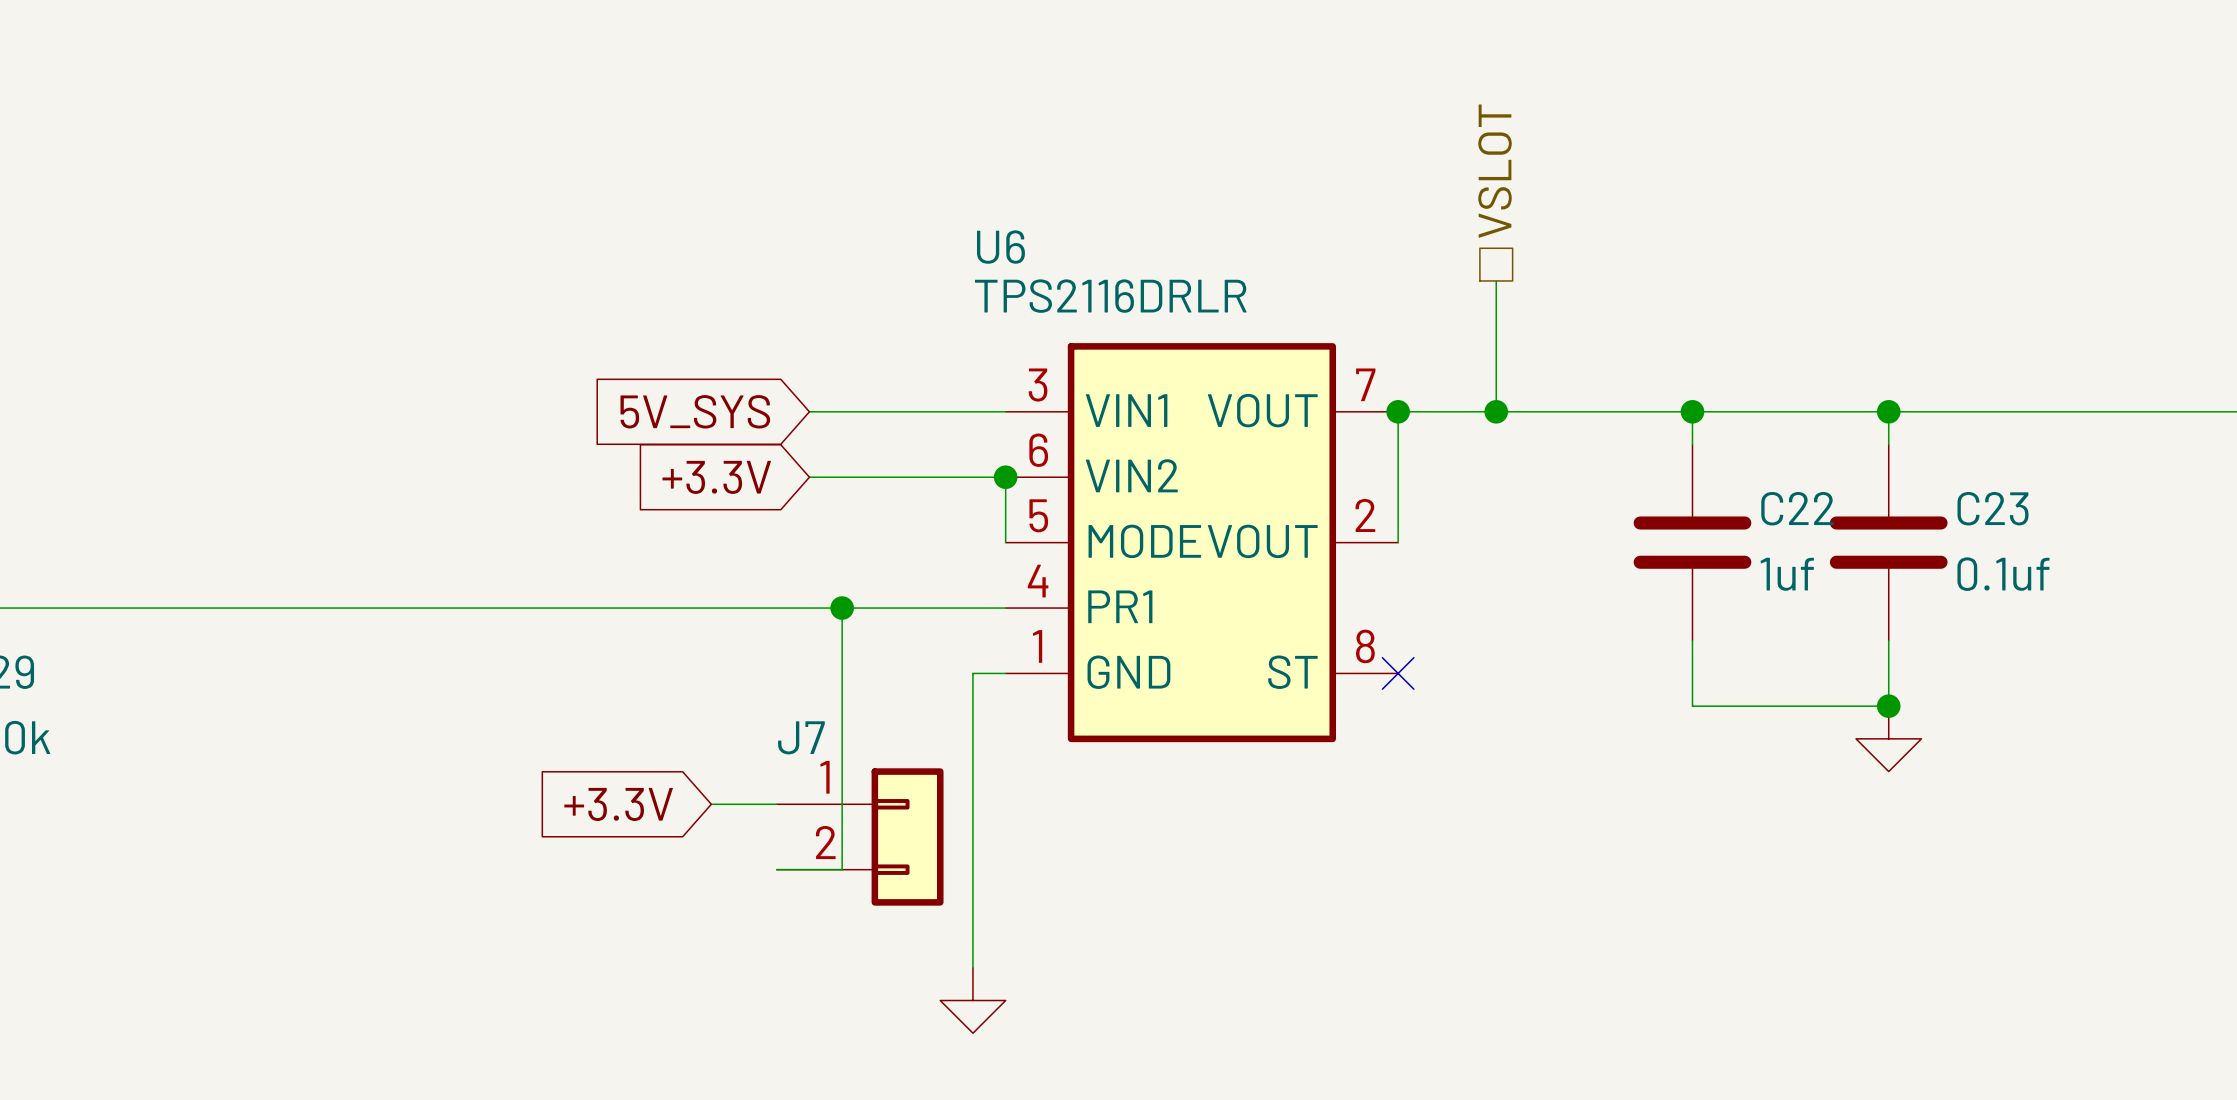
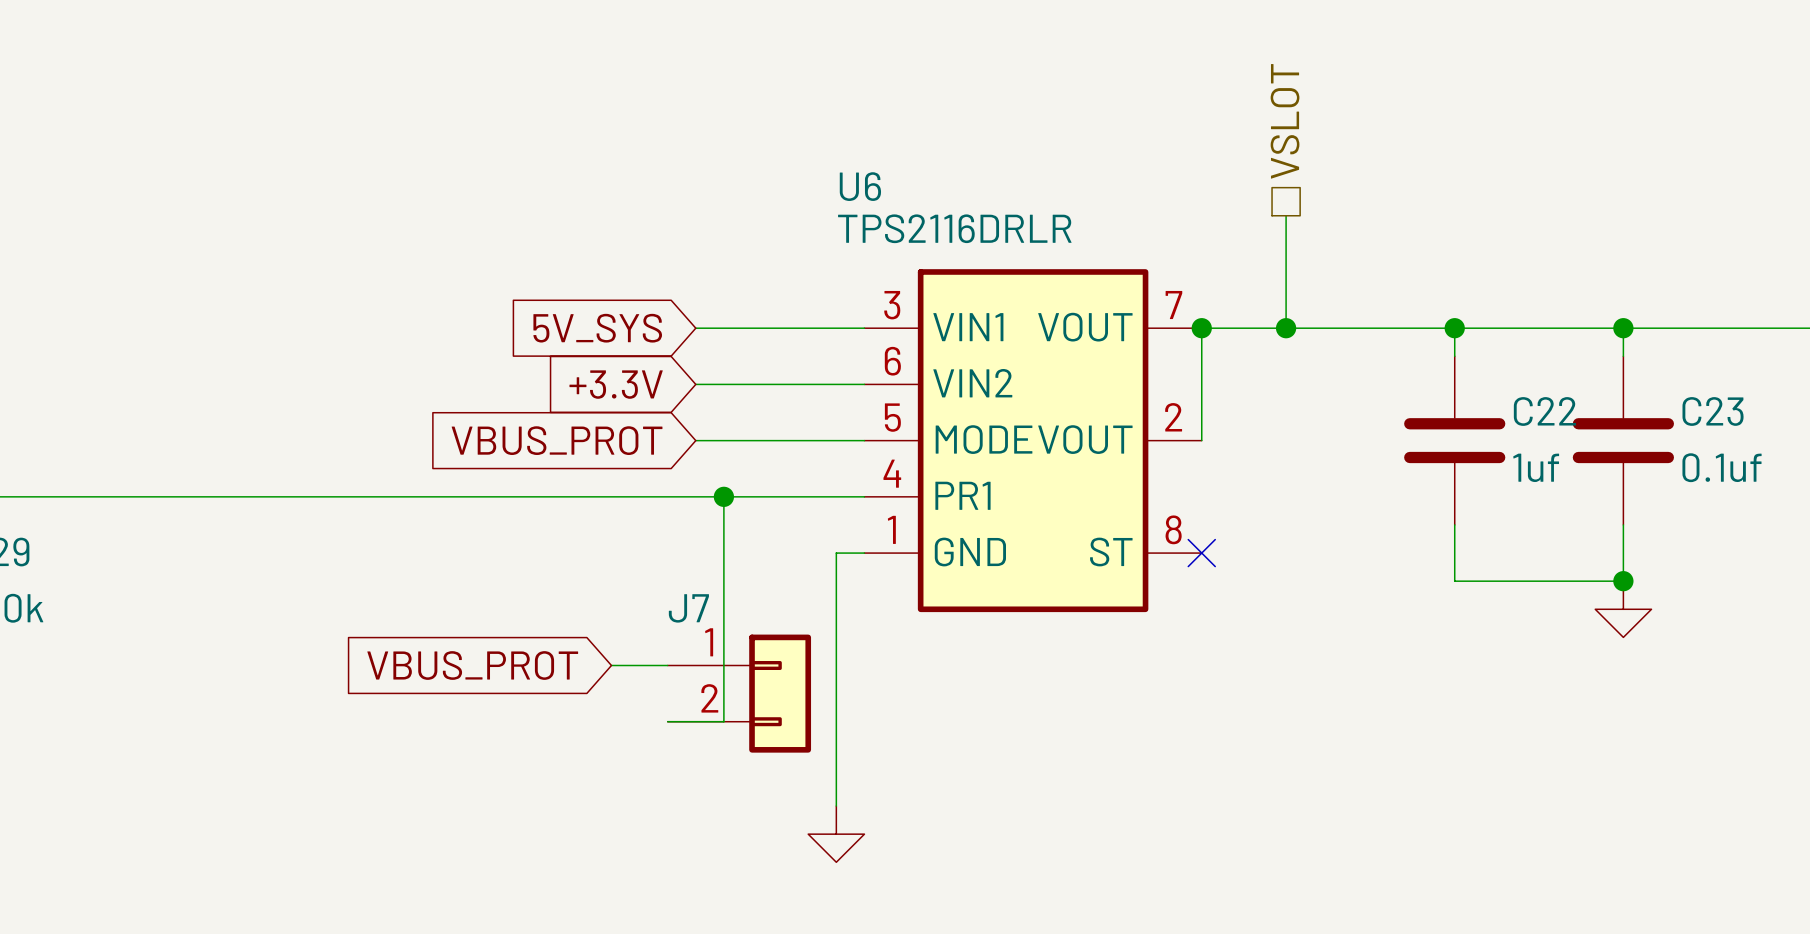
wire: (1005, 477) (1005, 542) -> (695, 440) (864, 440)
junction: (1005, 477) -> none
global label: none -> VBUS_PROT (557, 440)
global label: +3.3V (618, 804) -> VBUS_PROT (472, 665)

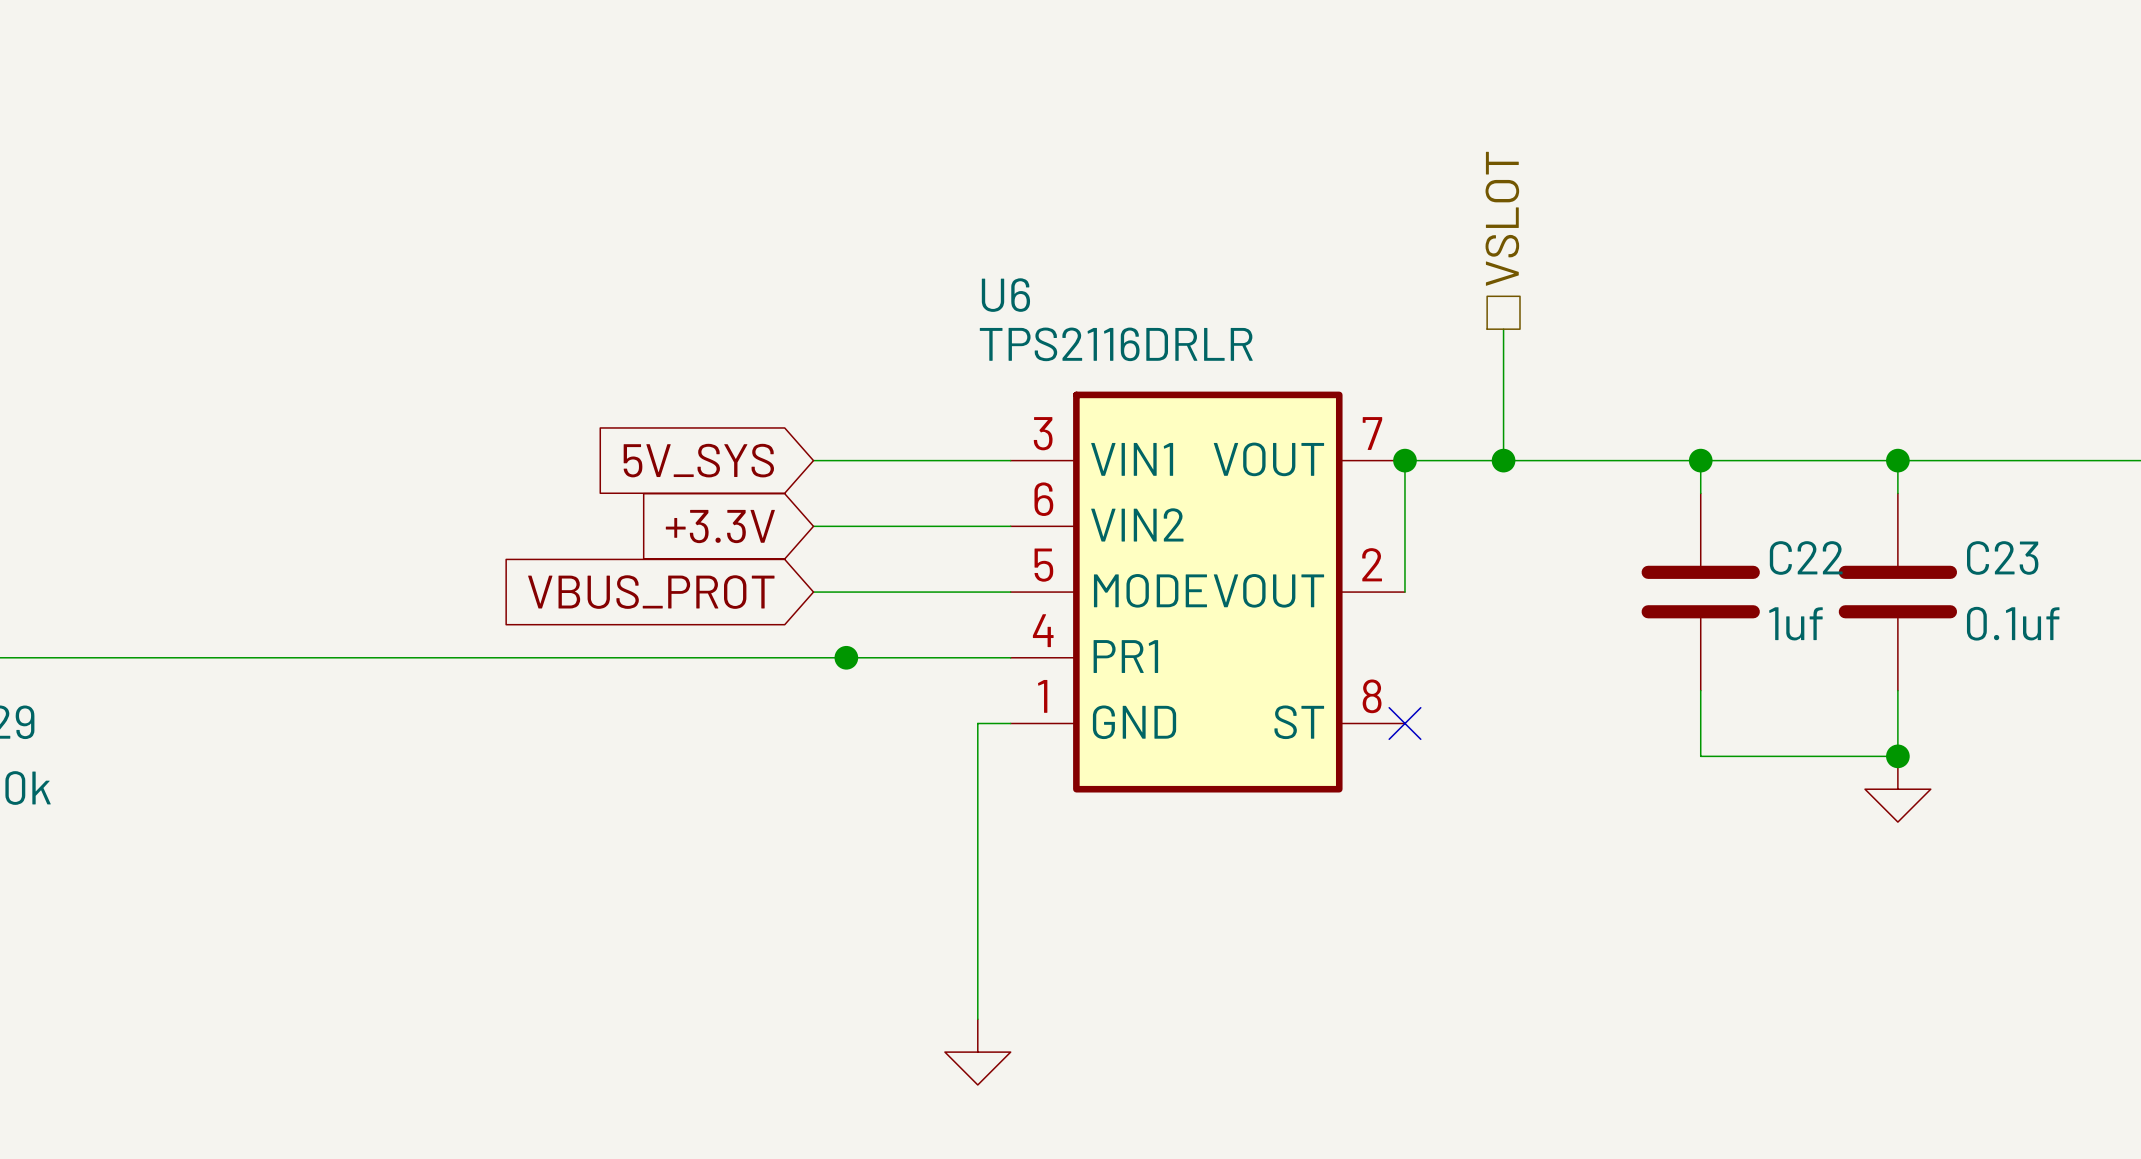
wire: (723, 496) (723, 721) (667, 721) -> none
global label: VBUS_PROT (472, 665) -> none
wire: (611, 665) (667, 665) -> none
J7: (739, 693) -> none

